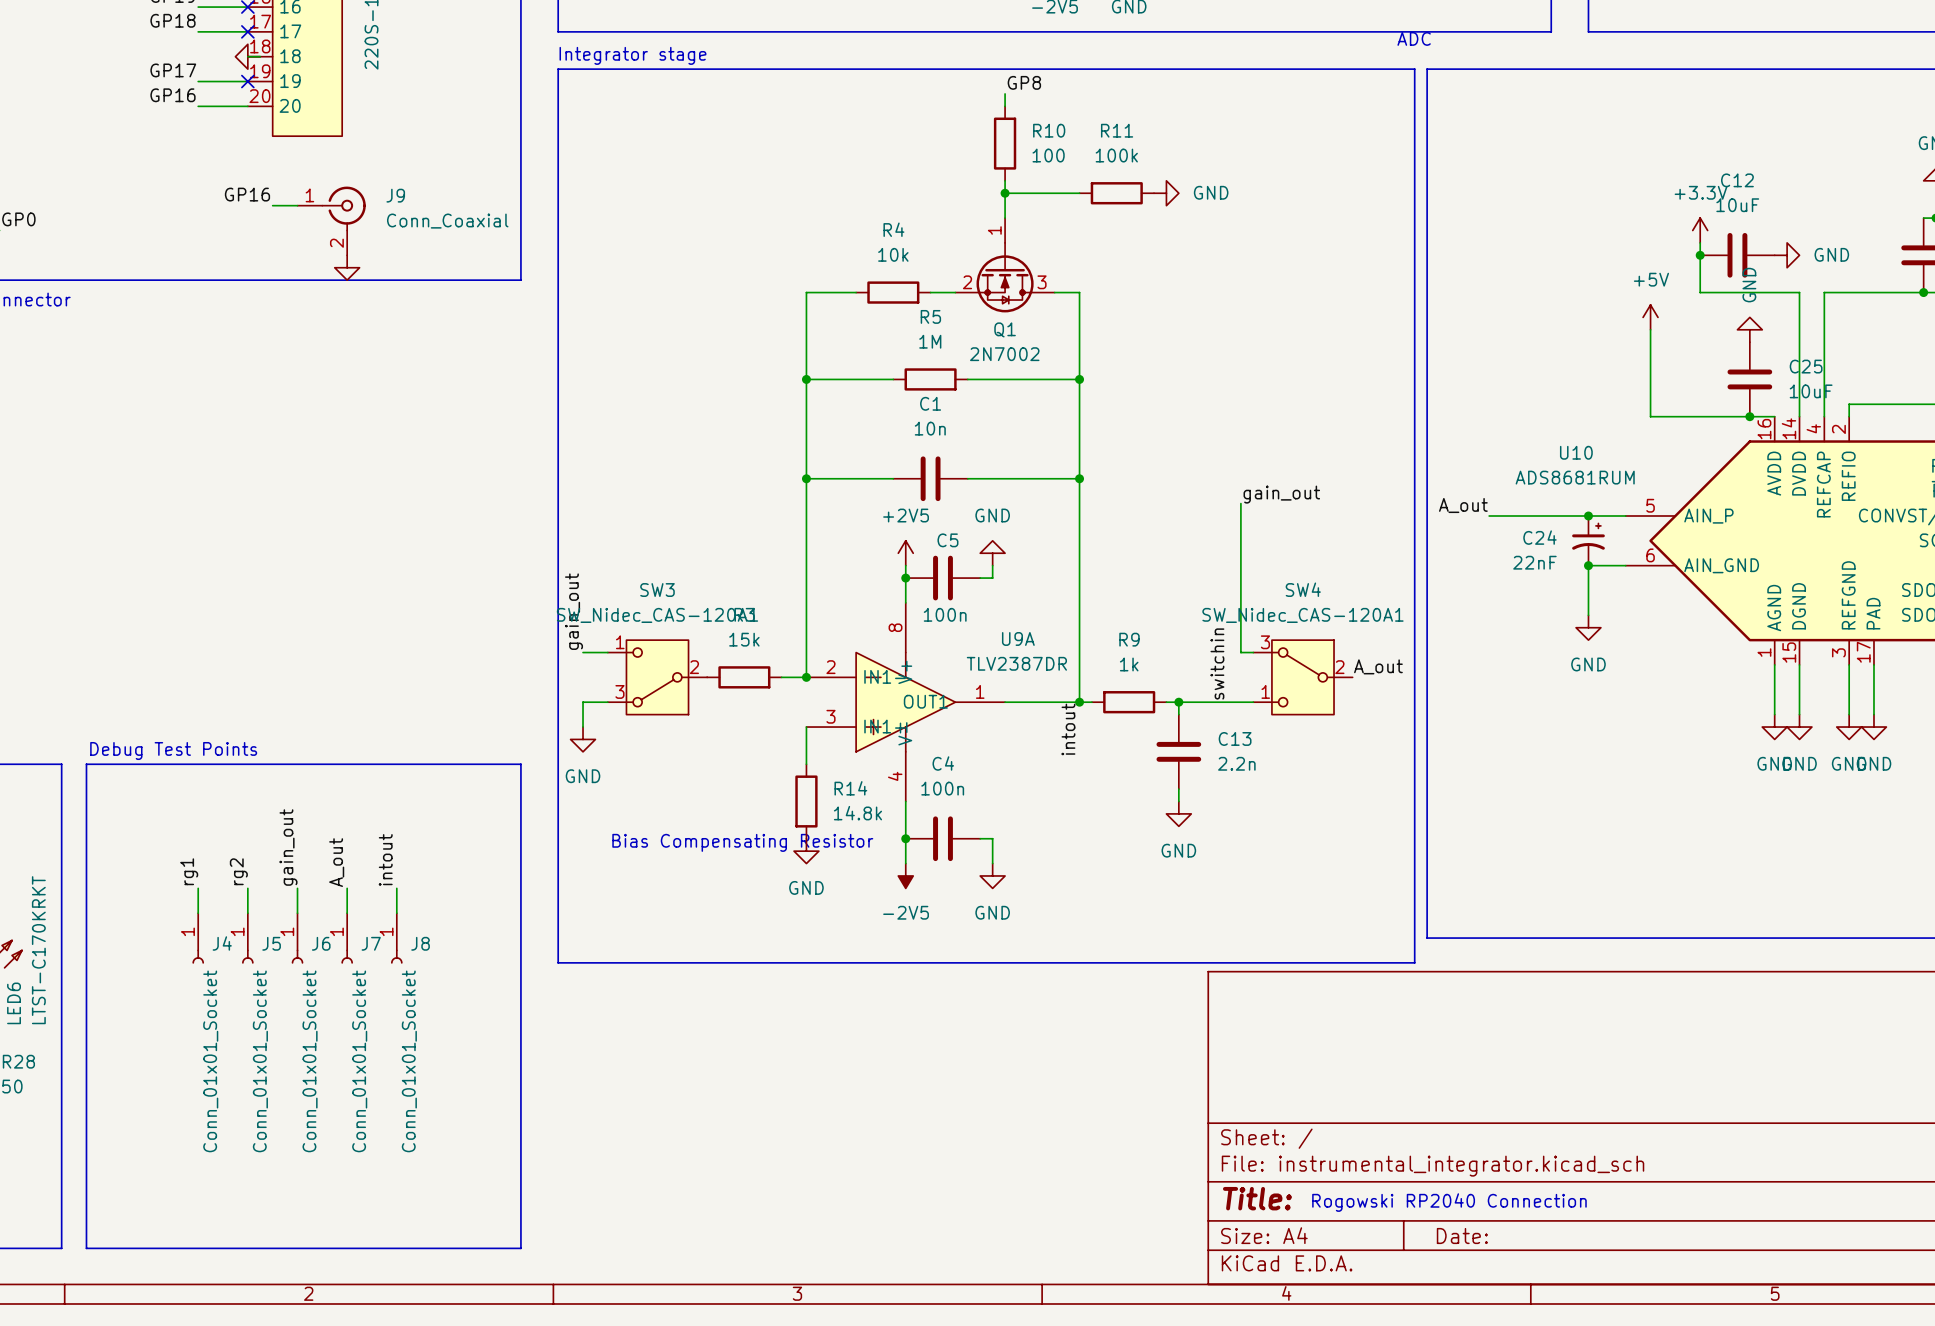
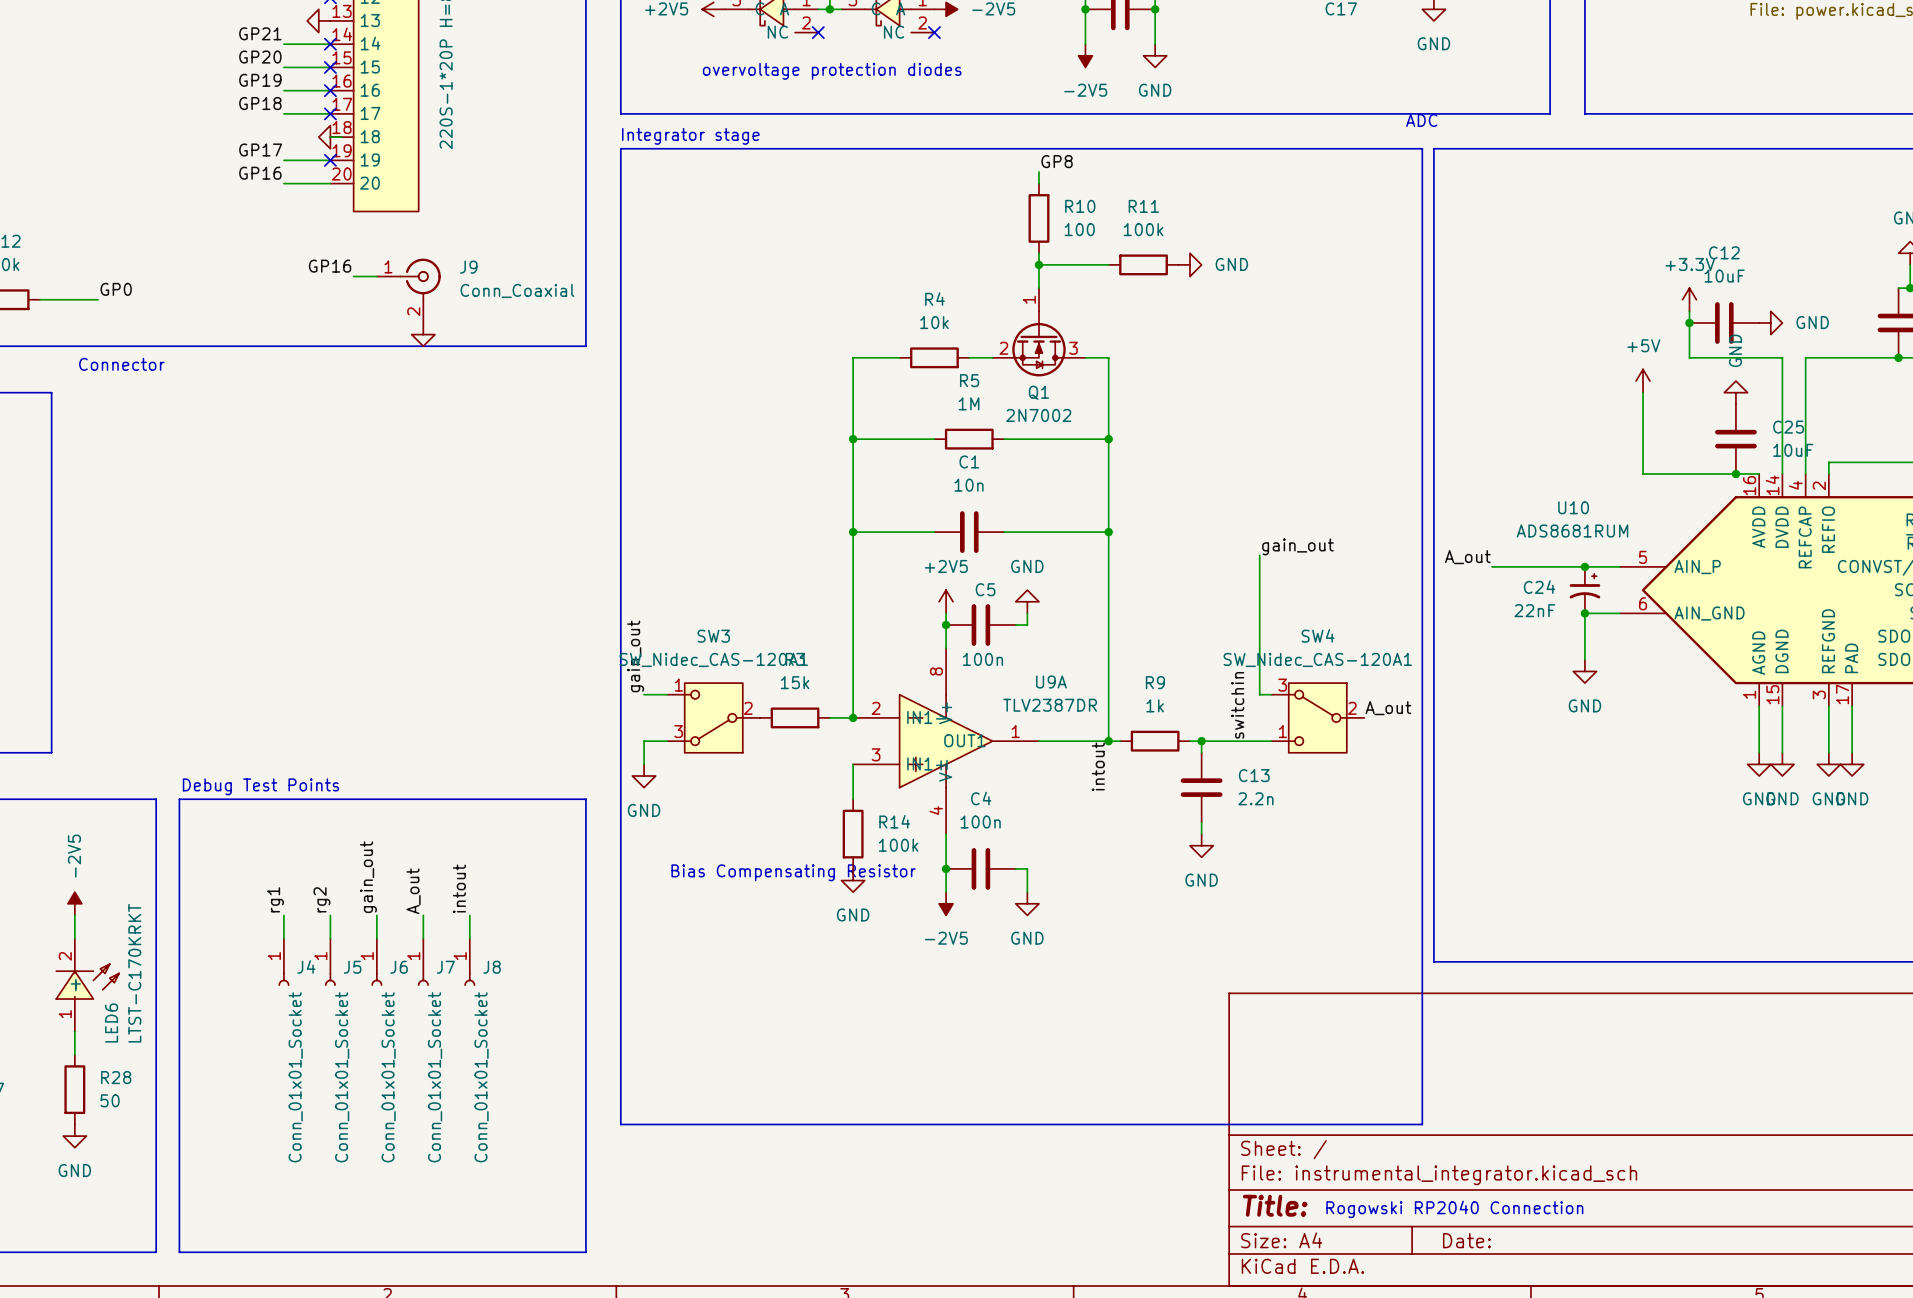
R14 value: 14.8k (857, 813) -> 100k (898, 845)
line: (558, 962) (1414, 962) -> (620, 985) (620, 1124) (1422, 1124) (1422, 985)

